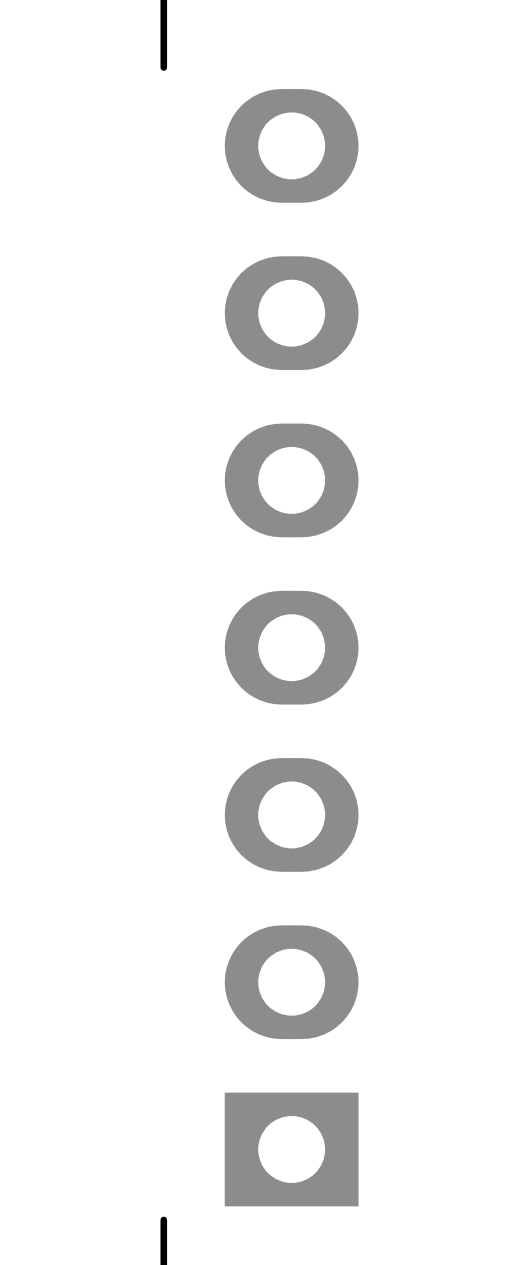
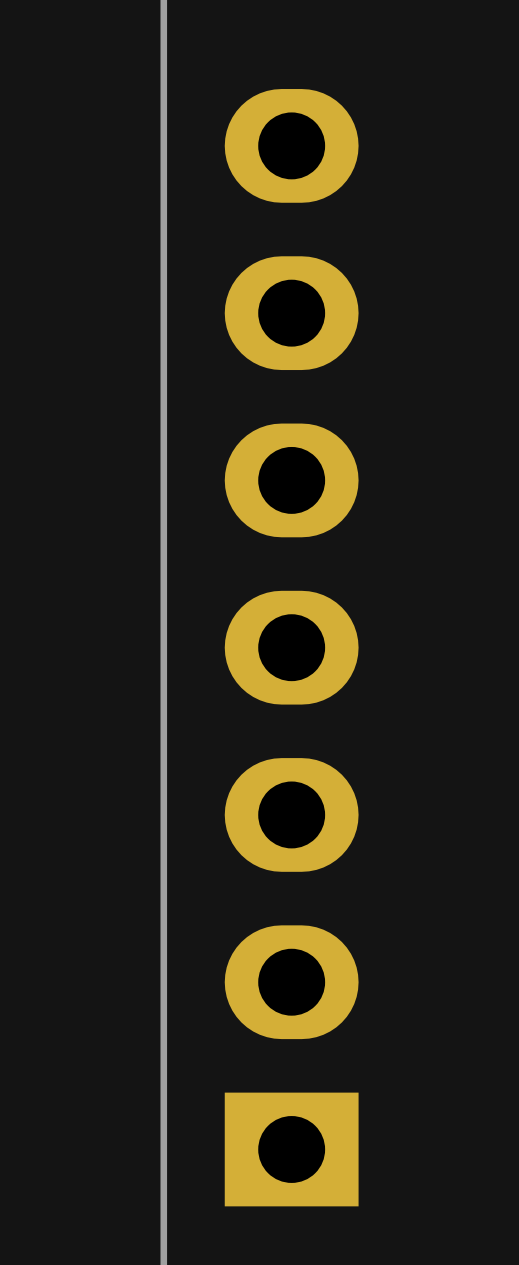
board edge: none -> (163, 67) (163, 1219)

